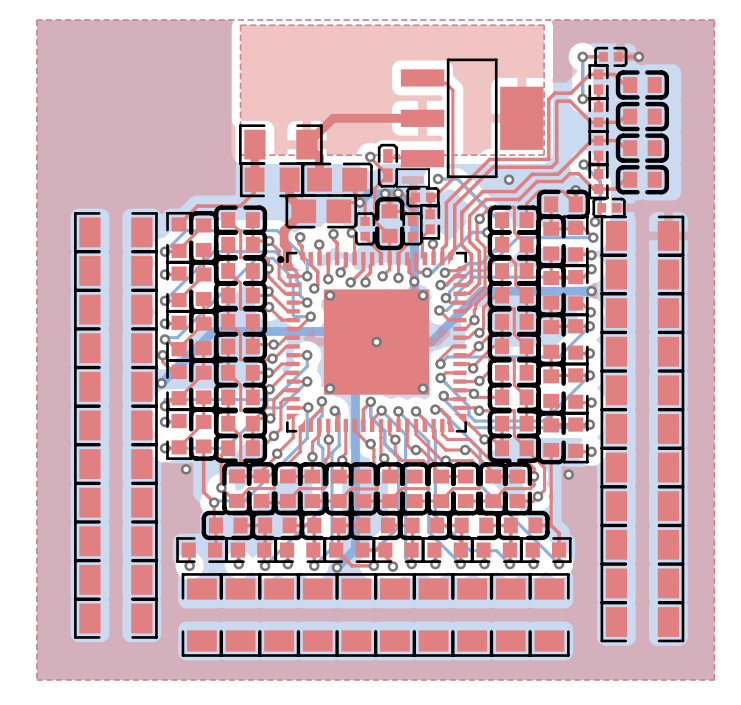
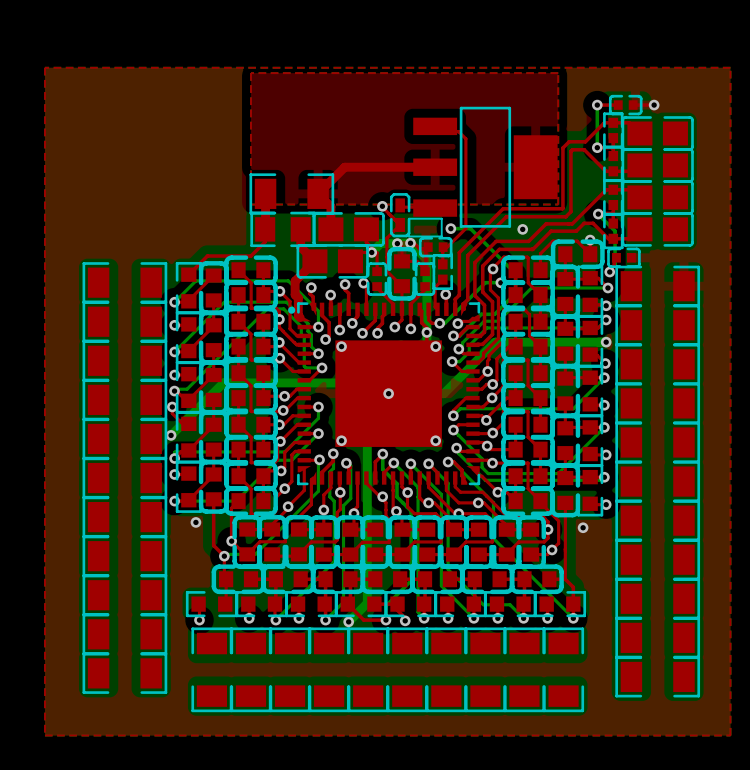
part footprint: [615, 70, 670, 100] -> [621, 116, 694, 151]
part footprint: [615, 101, 670, 132] -> [621, 148, 694, 183]
part footprint: [615, 133, 670, 163] -> [621, 180, 694, 215]
part footprint: [615, 165, 670, 195] -> [621, 212, 694, 247]

